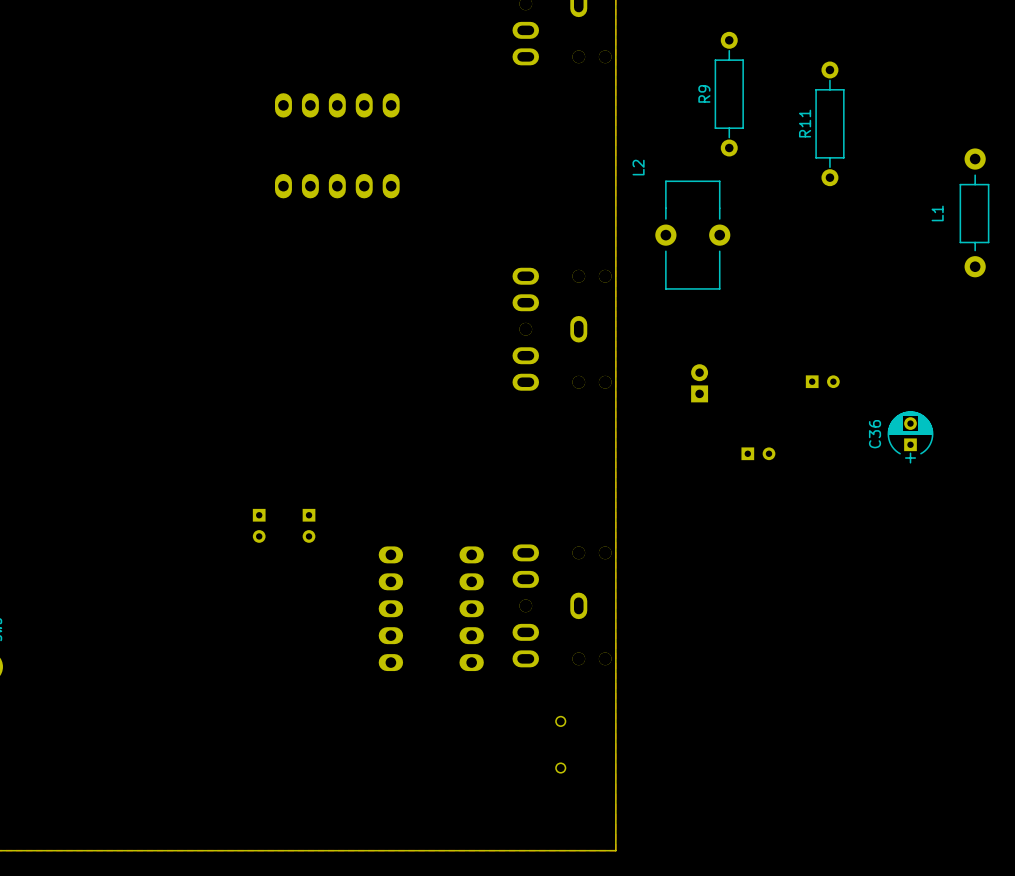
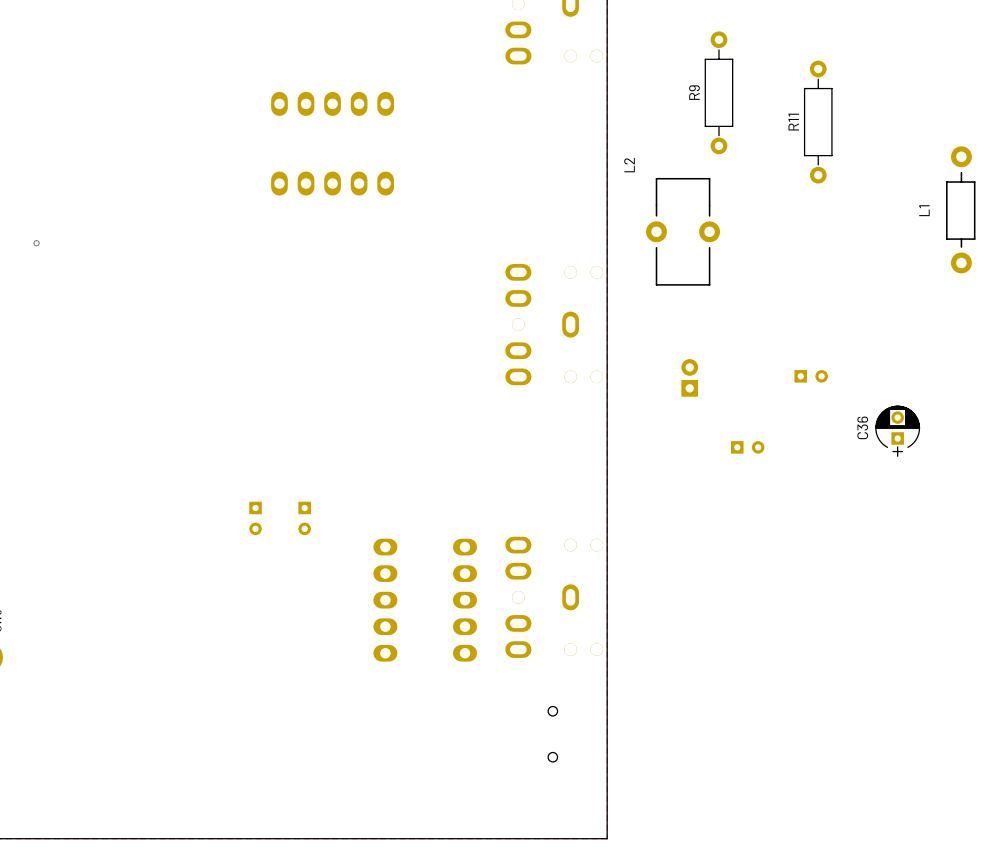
via: none -> (36, 243)

